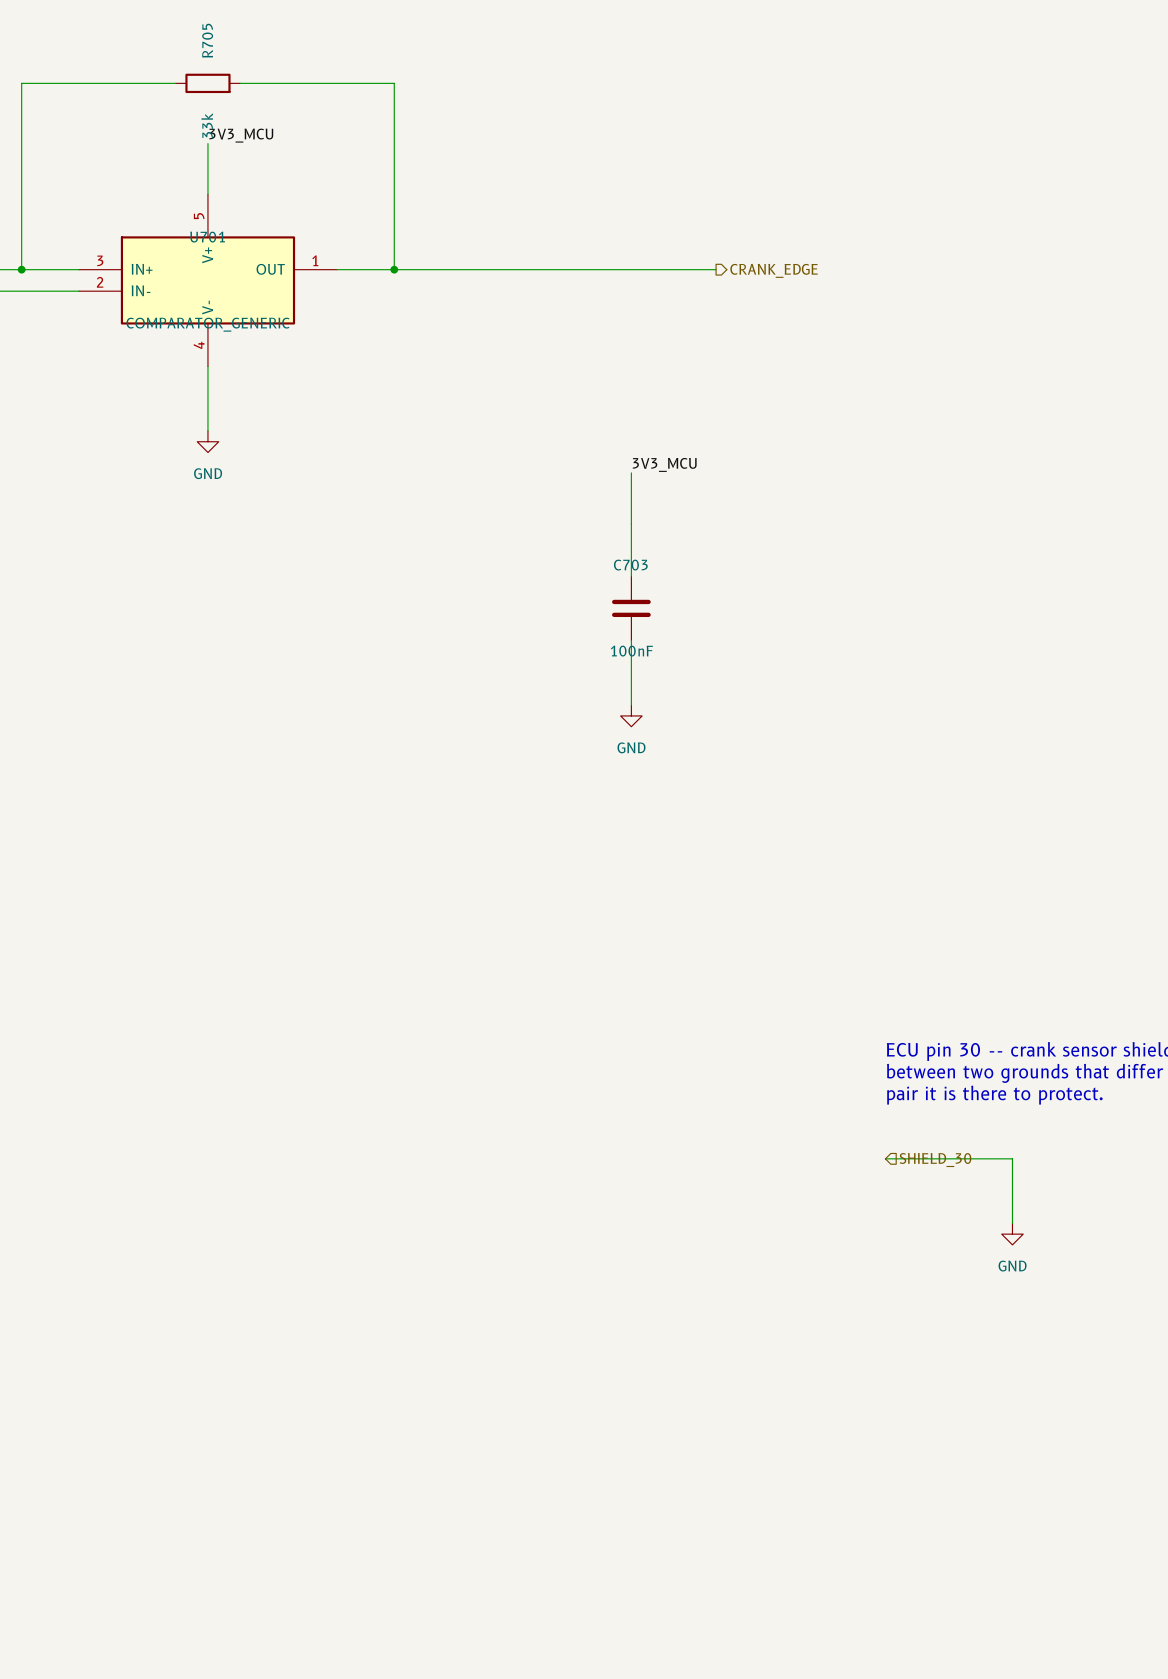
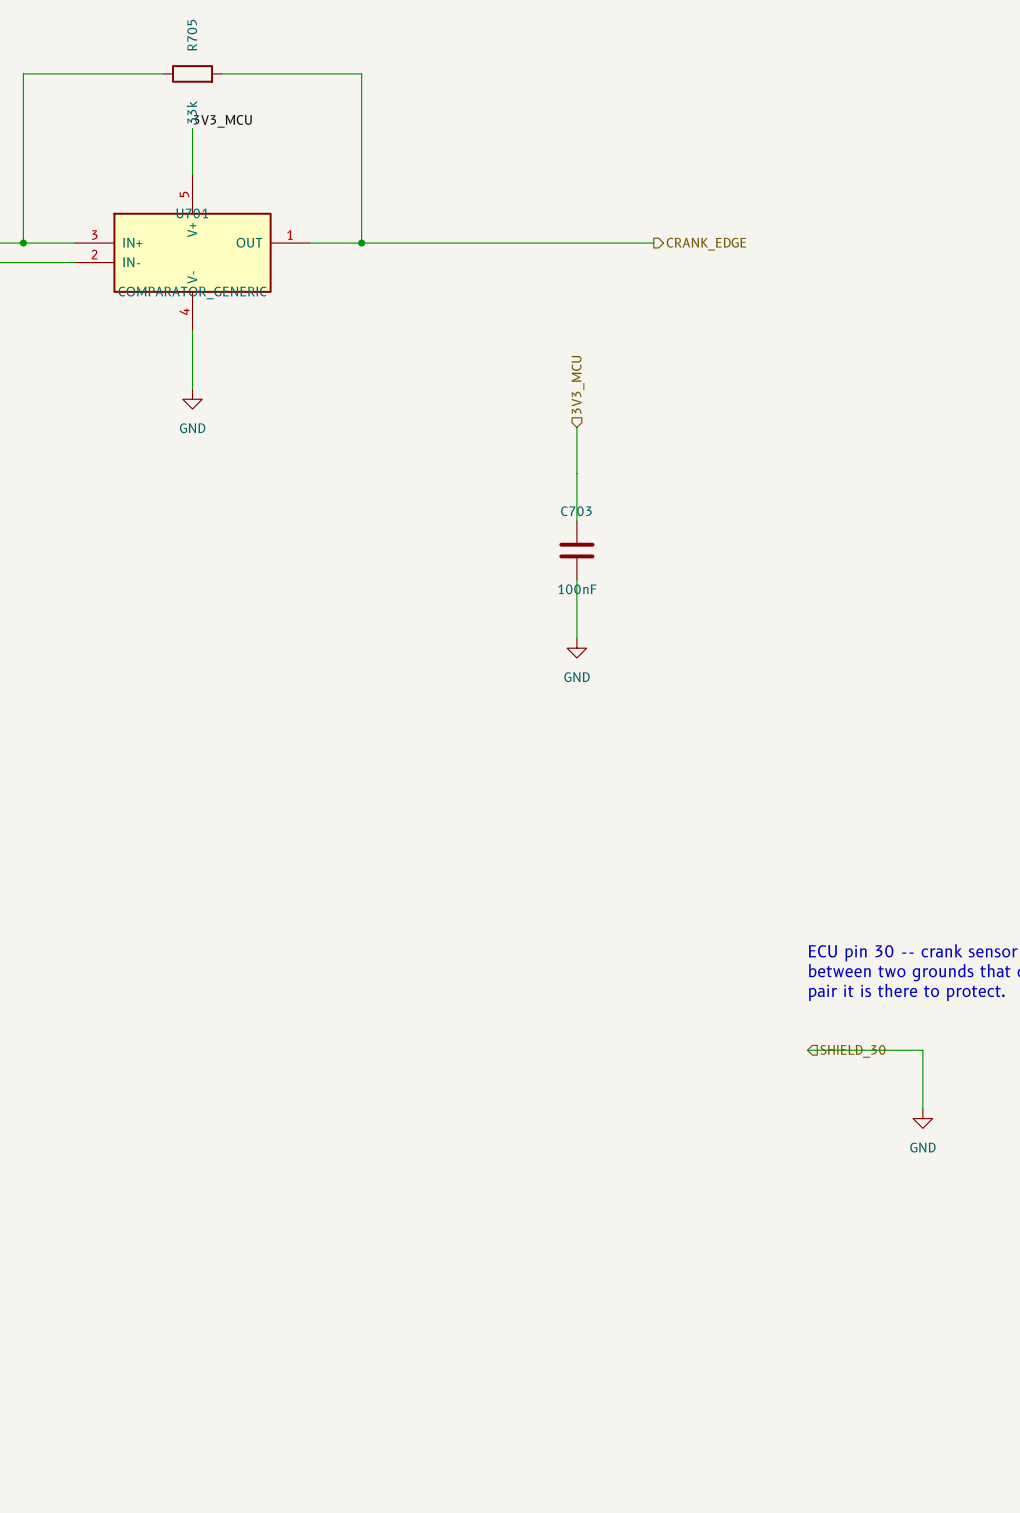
hierarchical label: none -> 3V3_MCU (578, 384)
label: 3V3_MCU (664, 464) -> none

